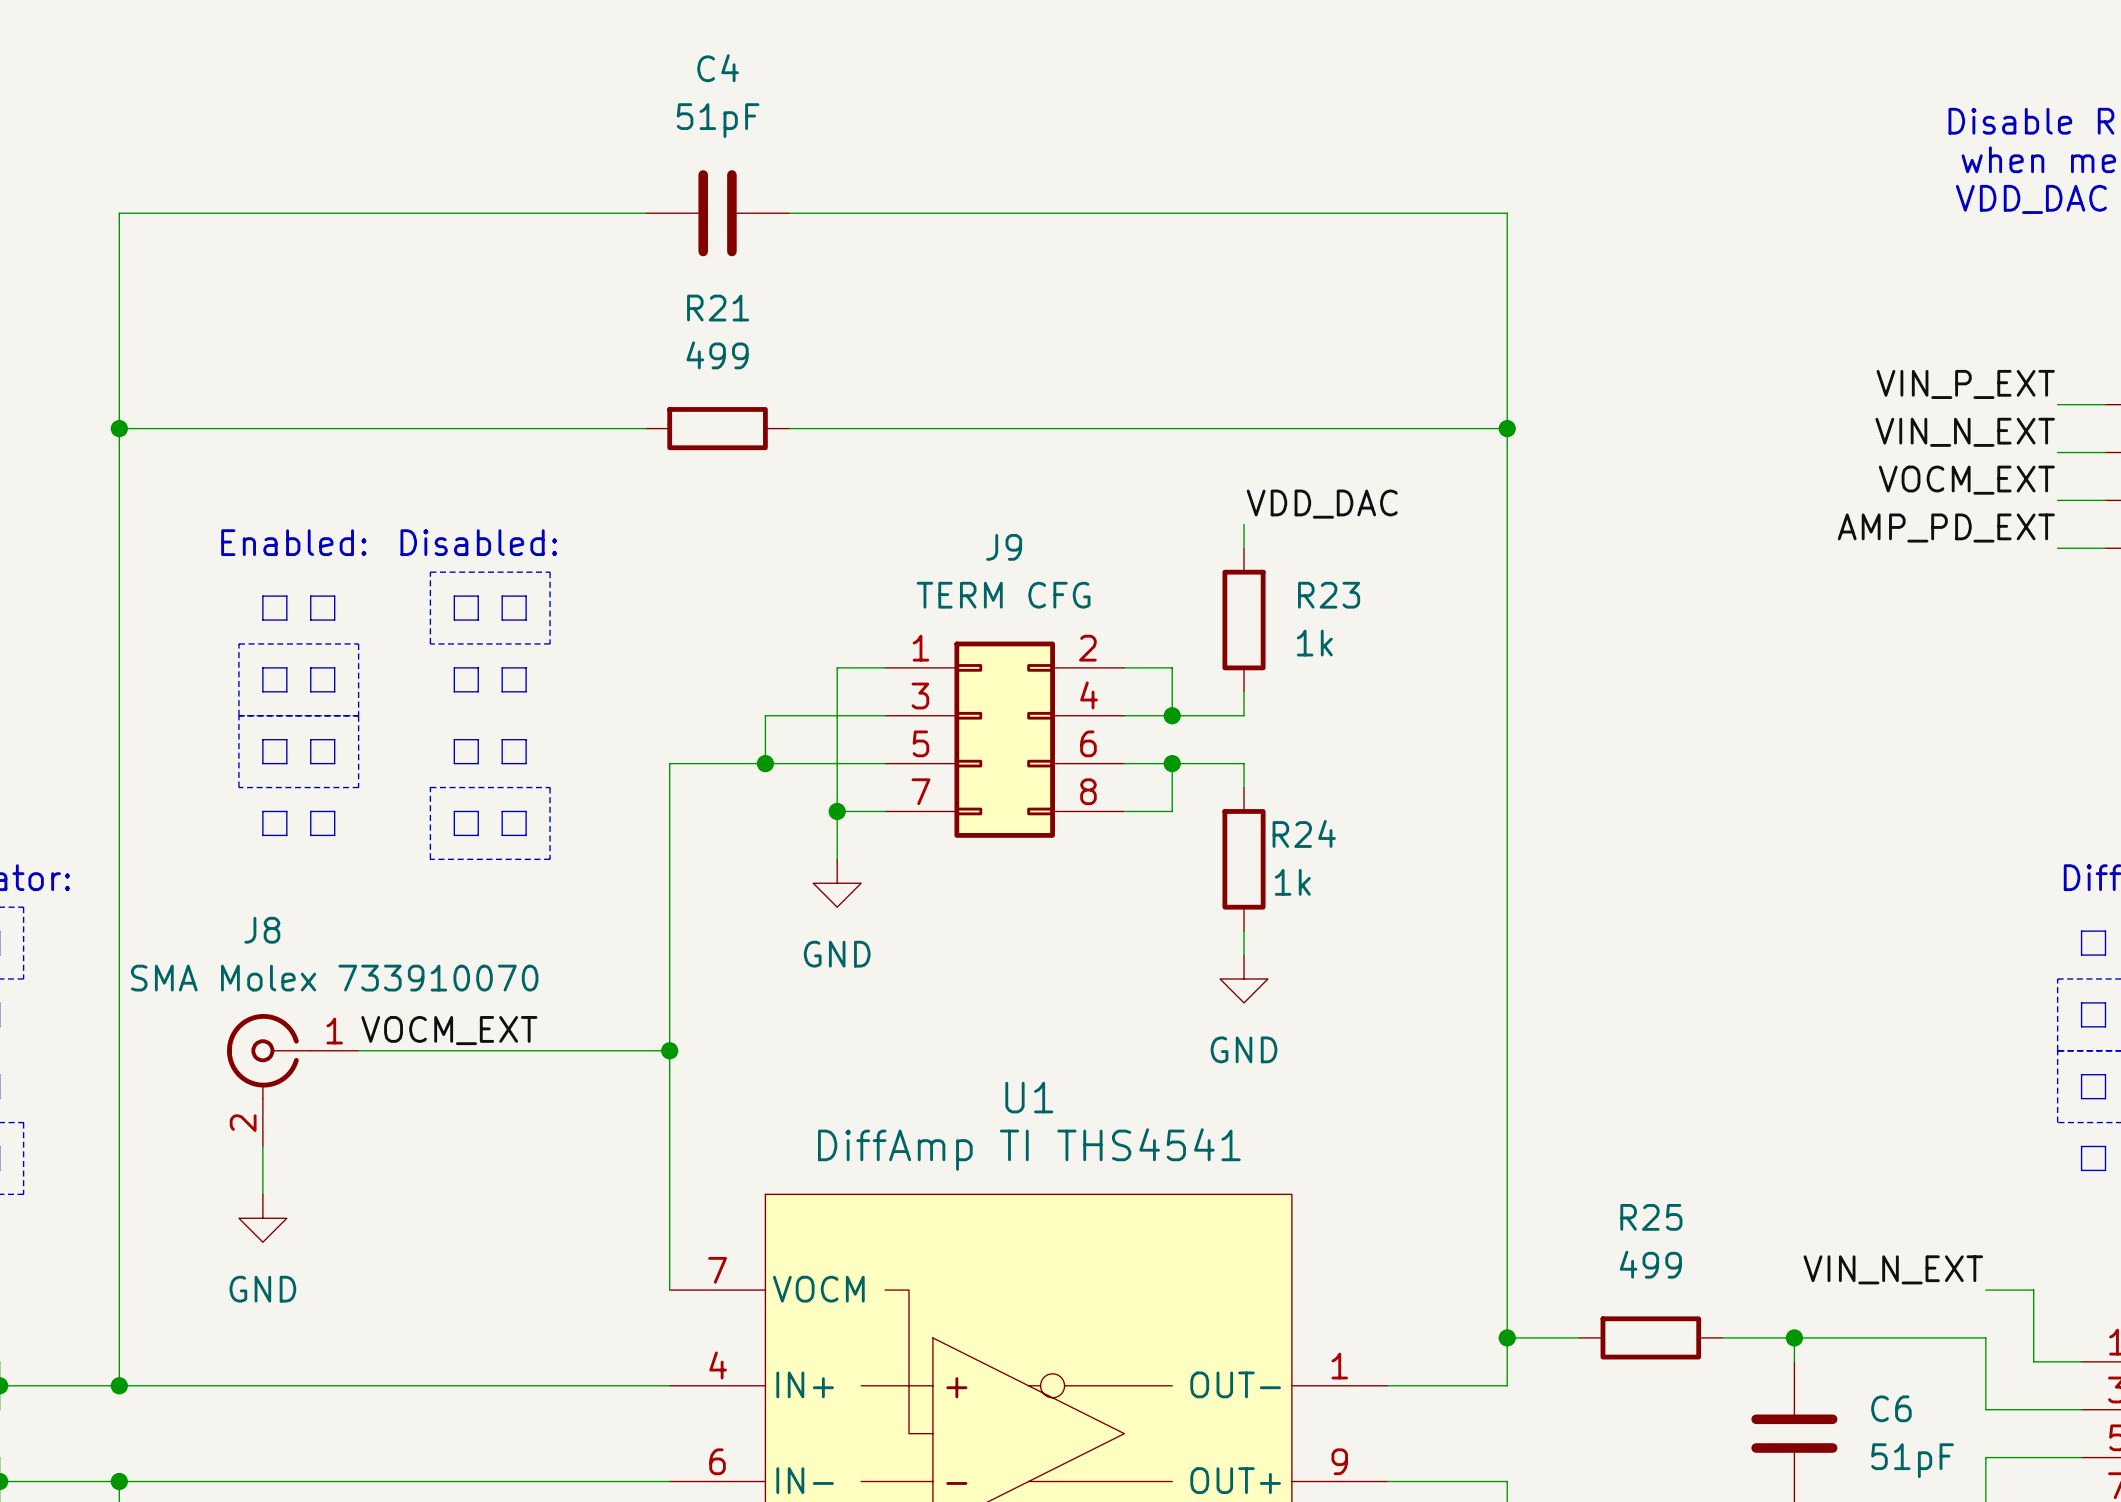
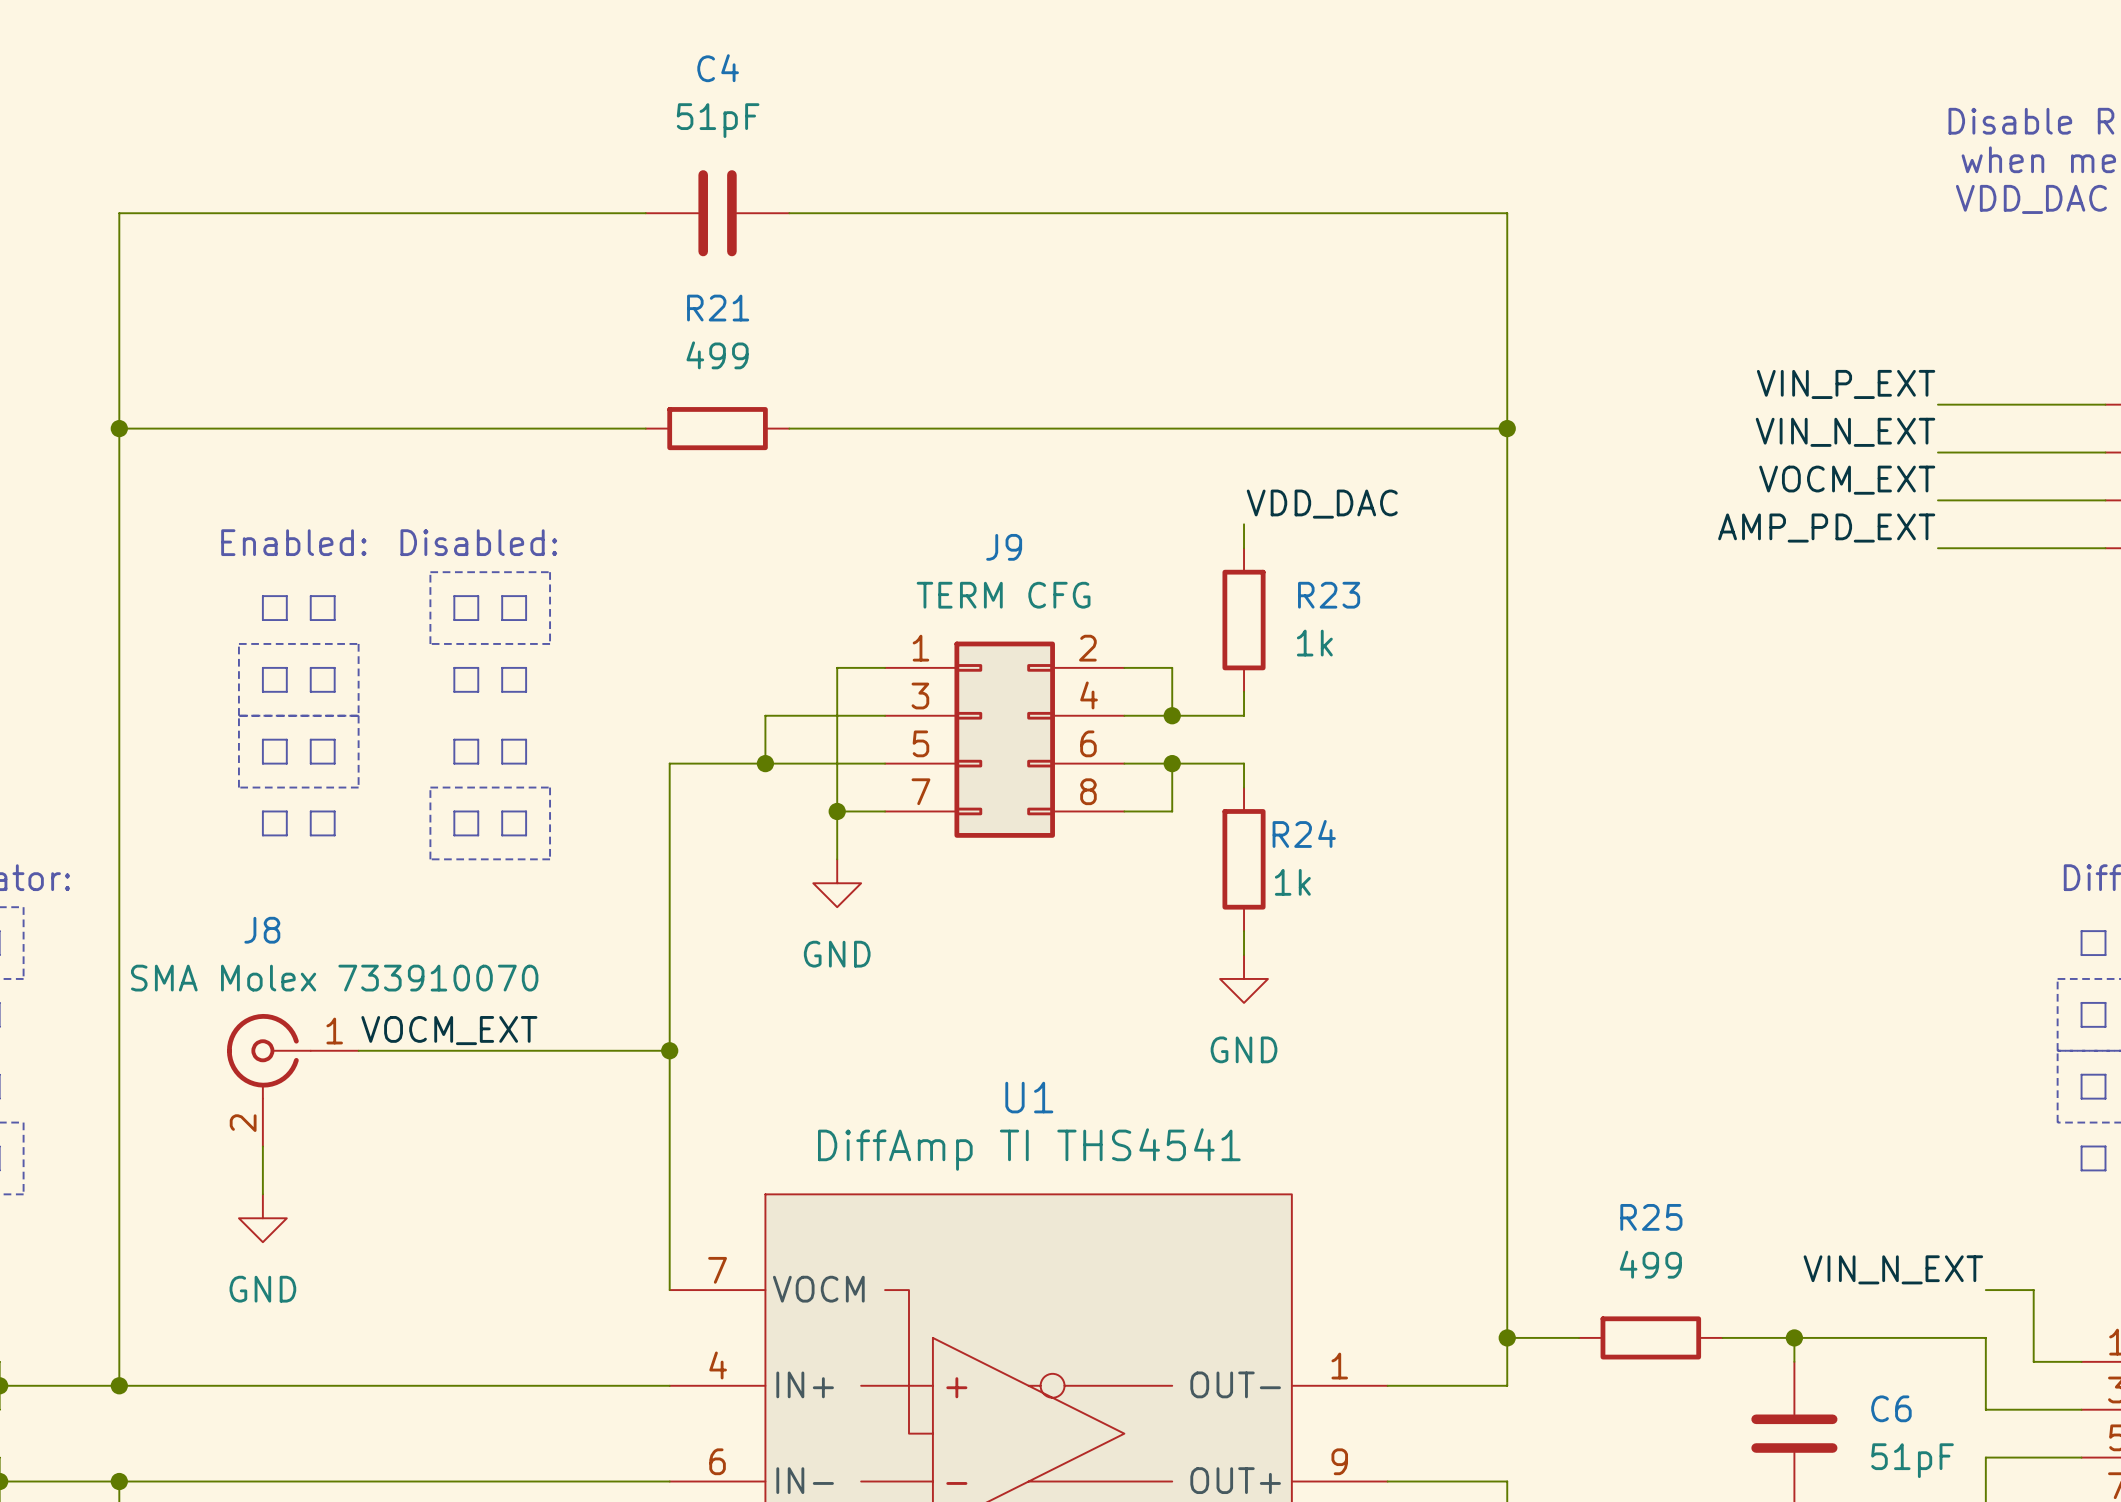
label position: VIN_P_EXT (1965, 384) -> VIN_P_EXT (1846, 384)
wire: none -> (1937, 404) (2057, 404)
label position: VIN_N_EXT (1965, 432) -> VIN_N_EXT (1845, 432)
wire: none -> (1937, 452) (2057, 452)
label position: VOCM_EXT (1966, 480) -> VOCM_EXT (1847, 480)
wire: none -> (1937, 500) (2057, 500)
label position: AMP_PD_EXT (1946, 528) -> AMP_PD_EXT (1826, 528)
wire: none -> (1937, 548) (2057, 548)

